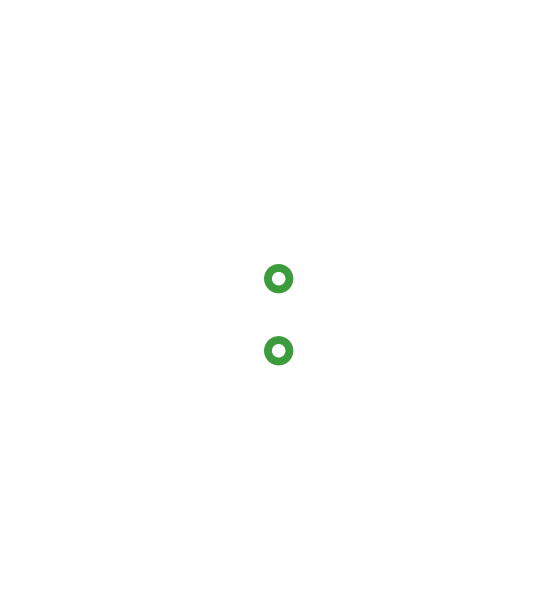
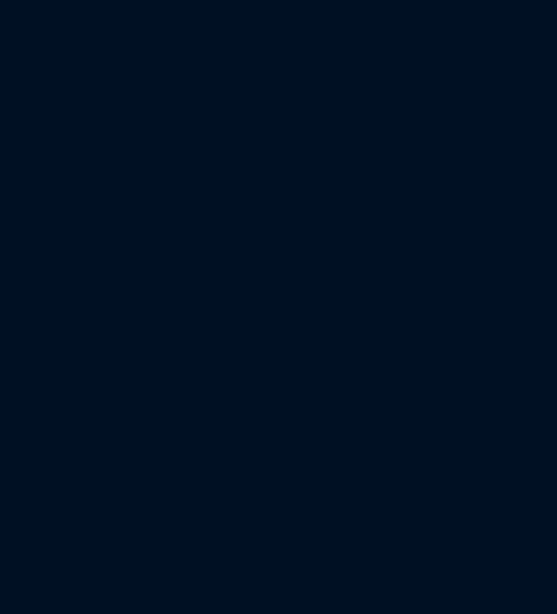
via: (278, 278) -> none
via: (278, 350) -> none

